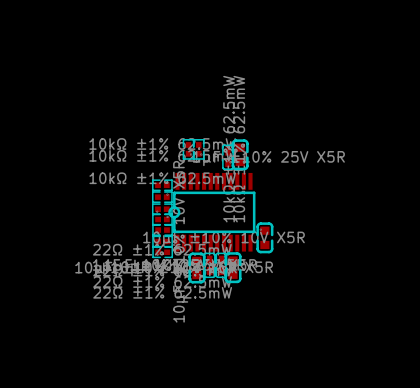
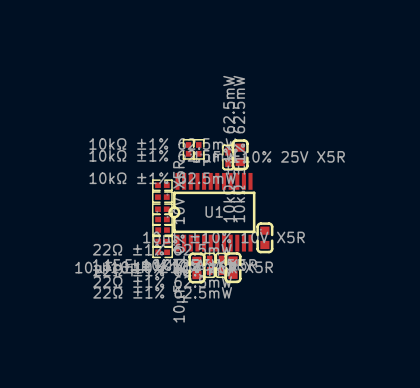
U1 name: none -> U1 (214, 211)

